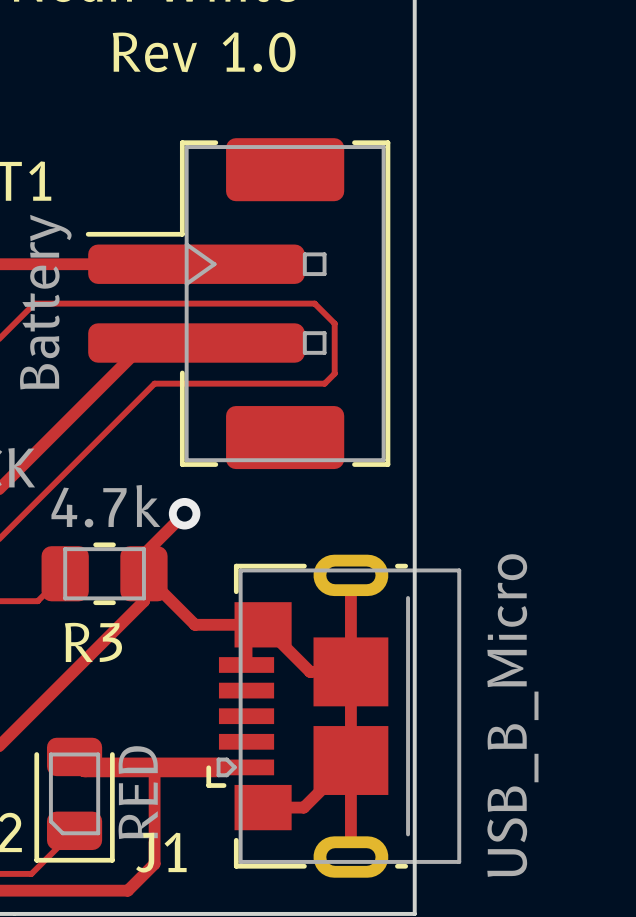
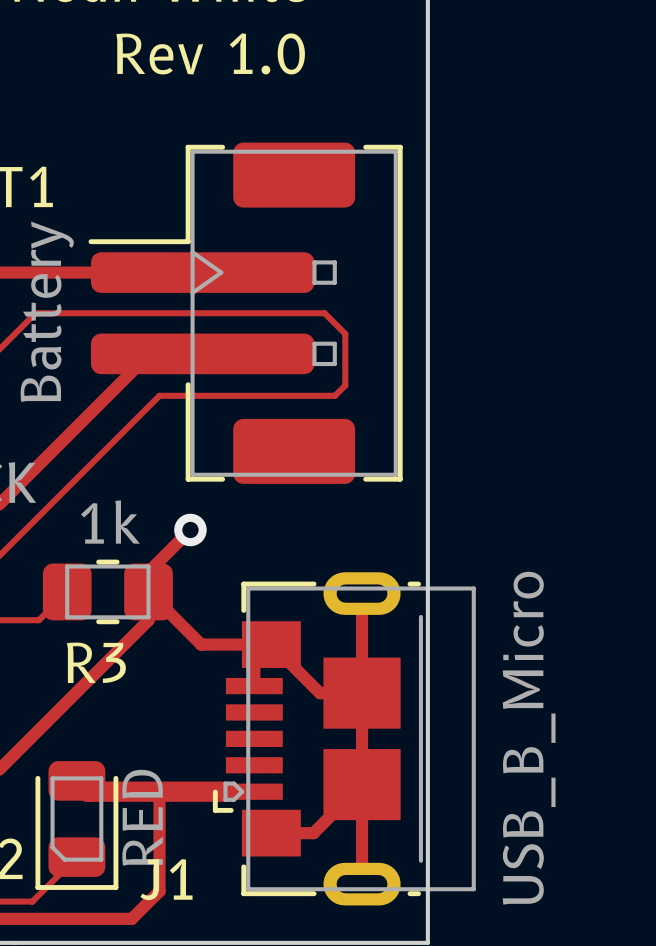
R3 value: 4.7k (105, 506) -> 1k (110, 522)

